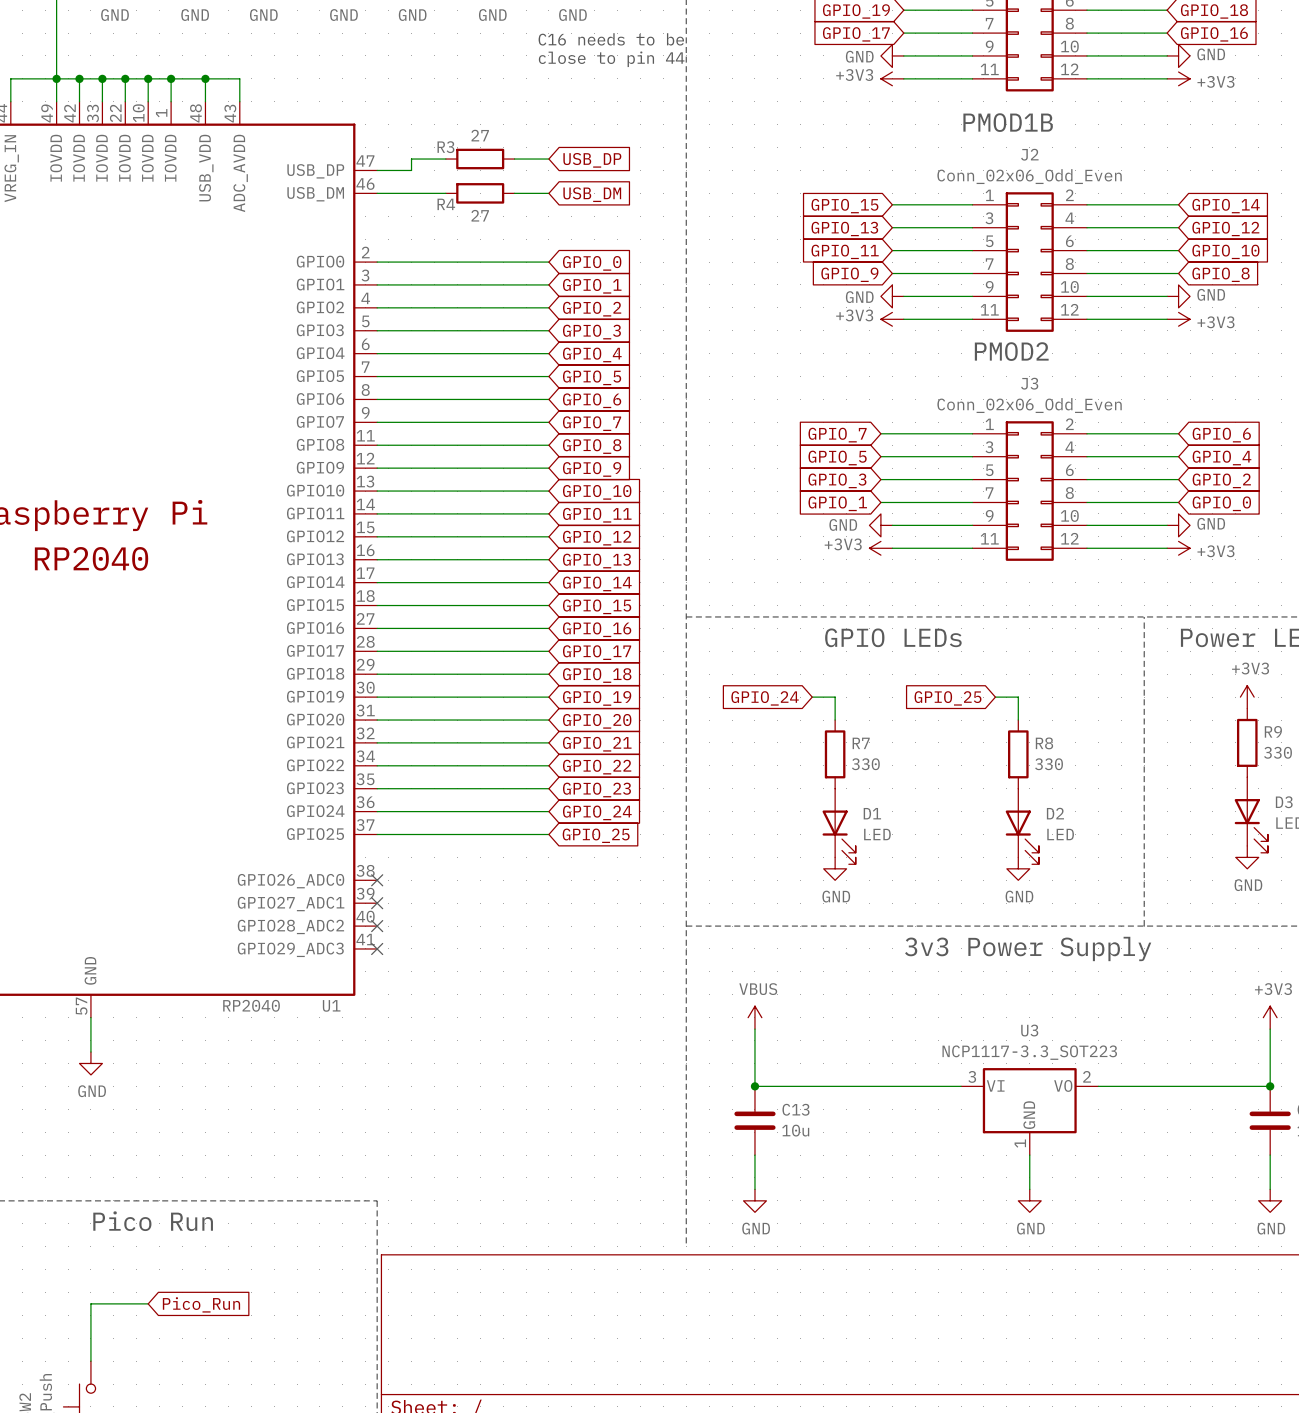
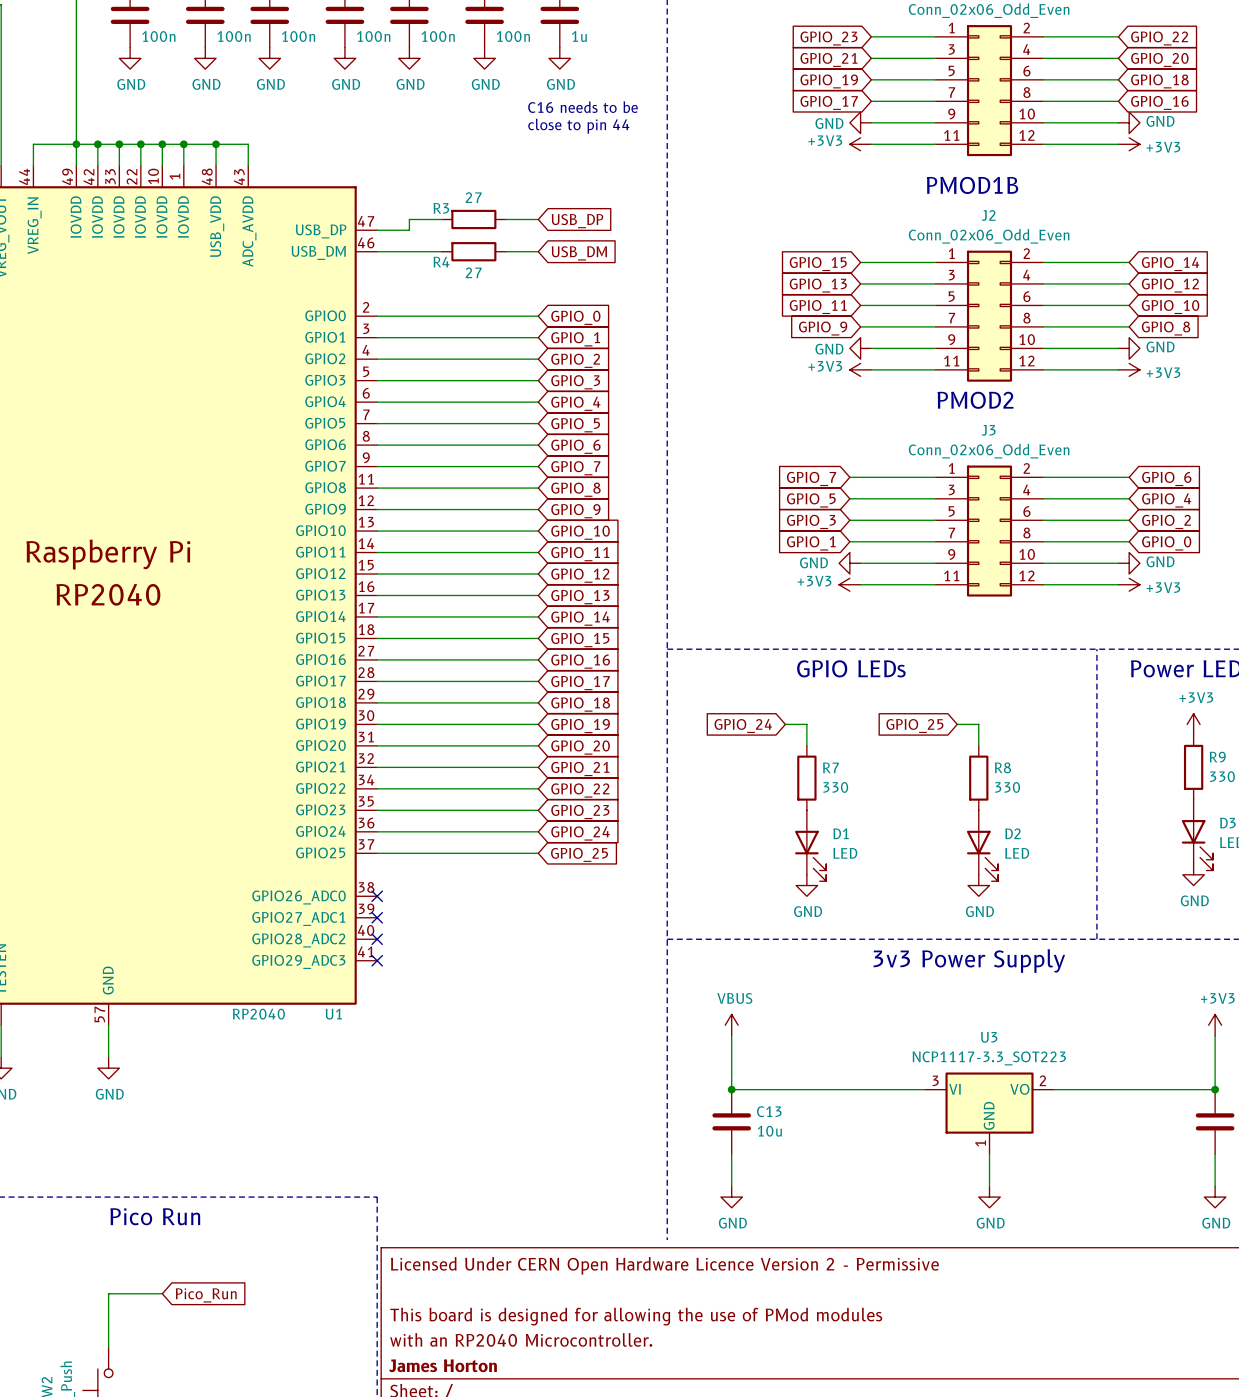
title block: none -> Licensed Under CERN Open Hardware Licence Version 2 - Permissive (664, 1265)
title block: none -> This board is designed for allowing the use of PMod modules (636, 1316)
title block: none -> with an RP2040 Microcontroller. (521, 1339)
title block: none -> James Horton (443, 1365)

